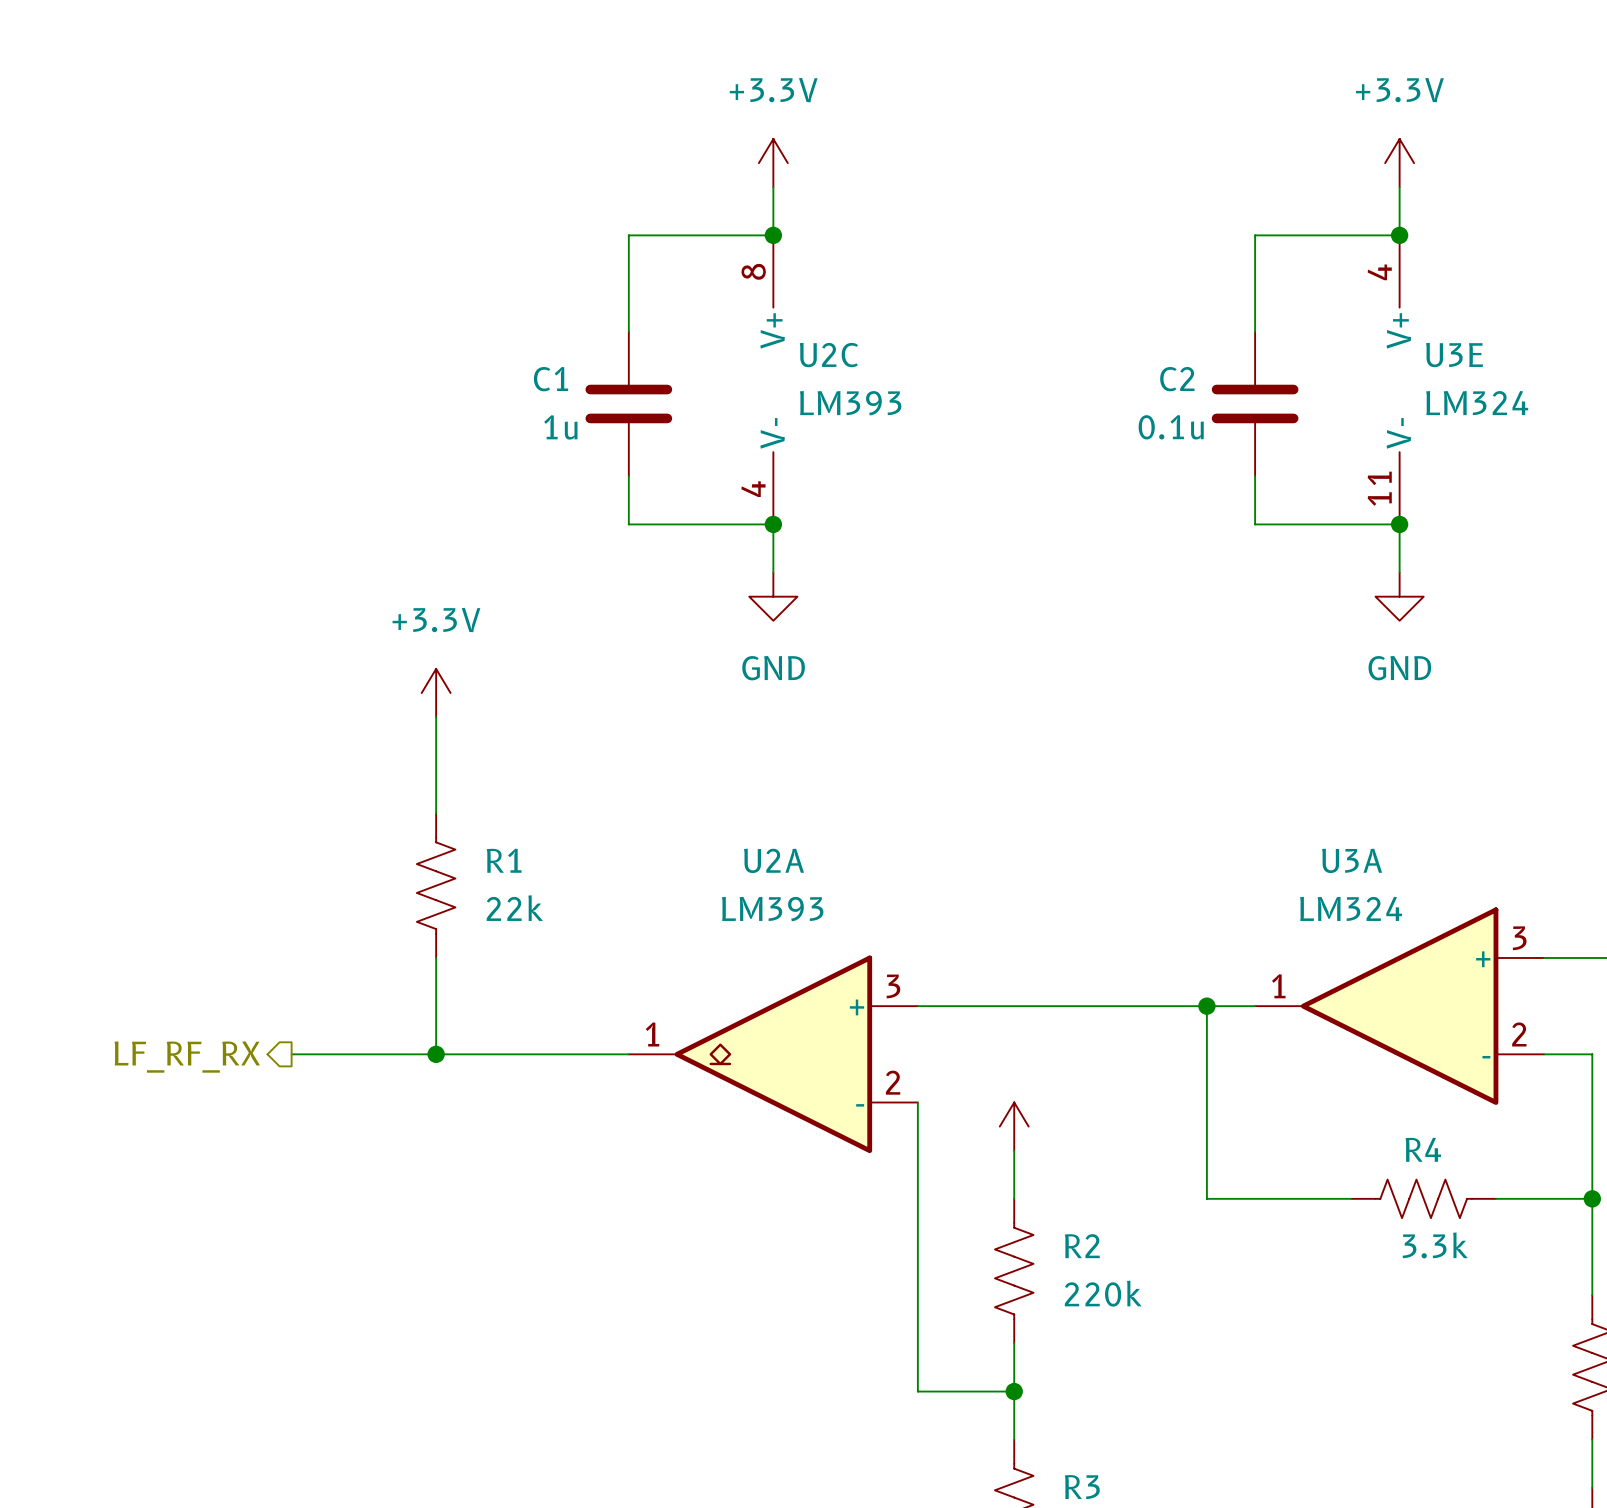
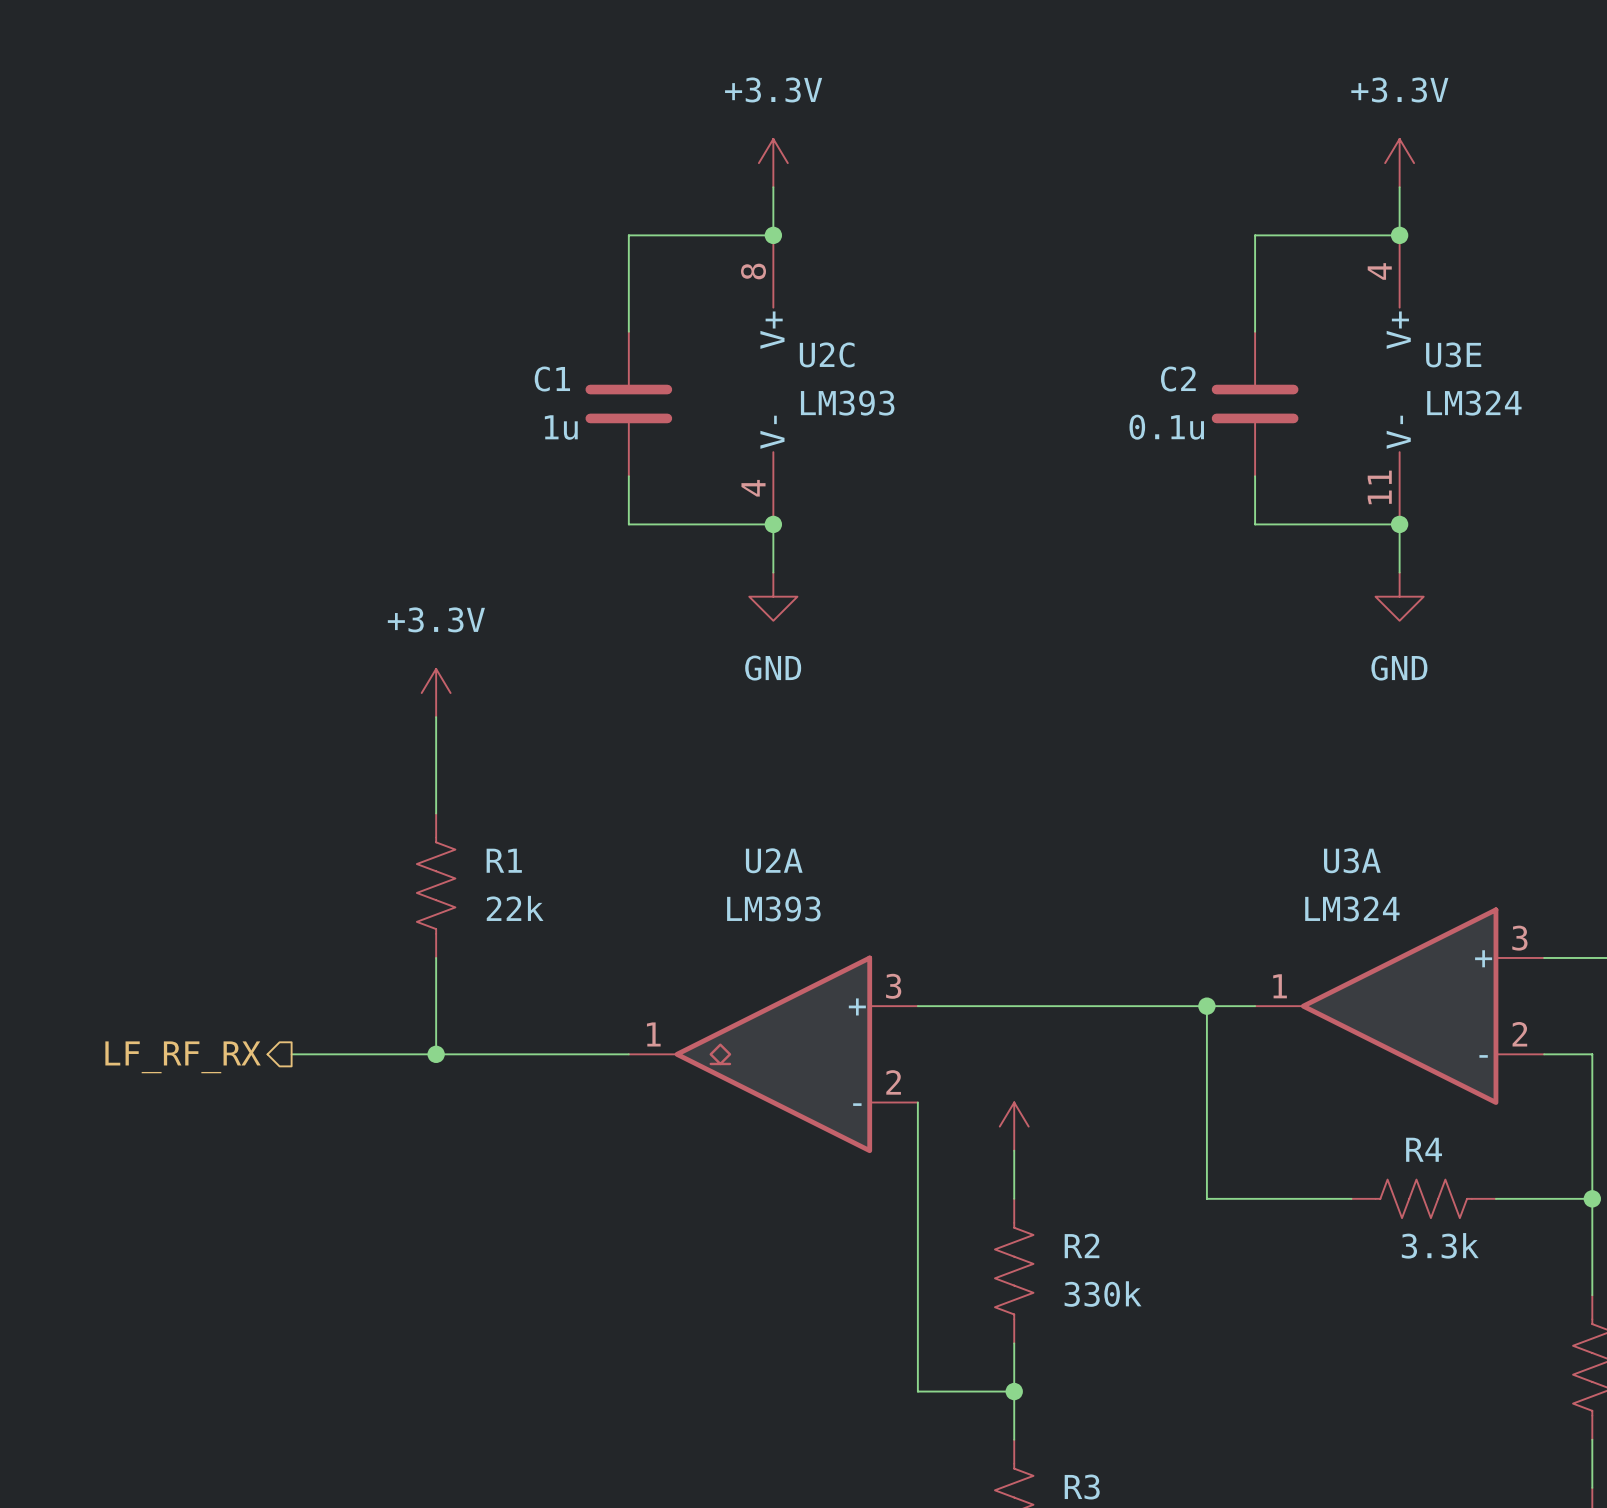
R2 value: 220k (1103, 1293) -> 330k (1103, 1294)

